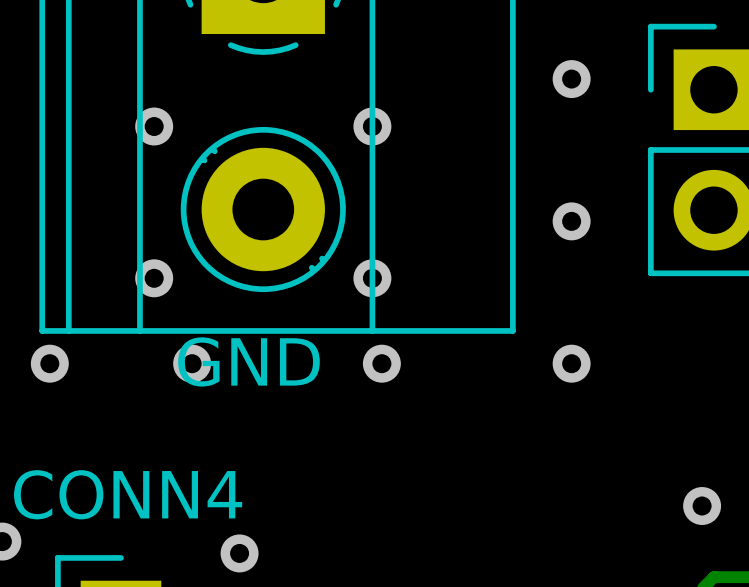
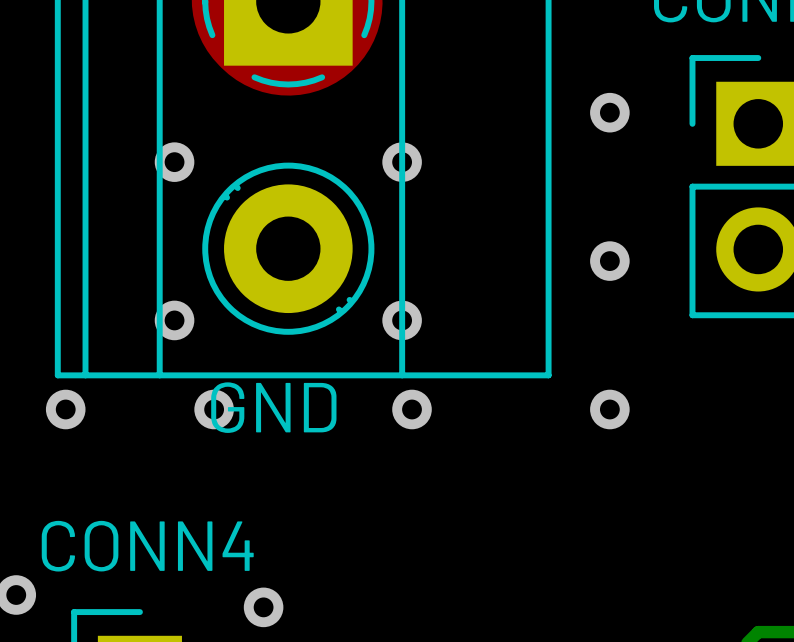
via: (702, 506) -> none

